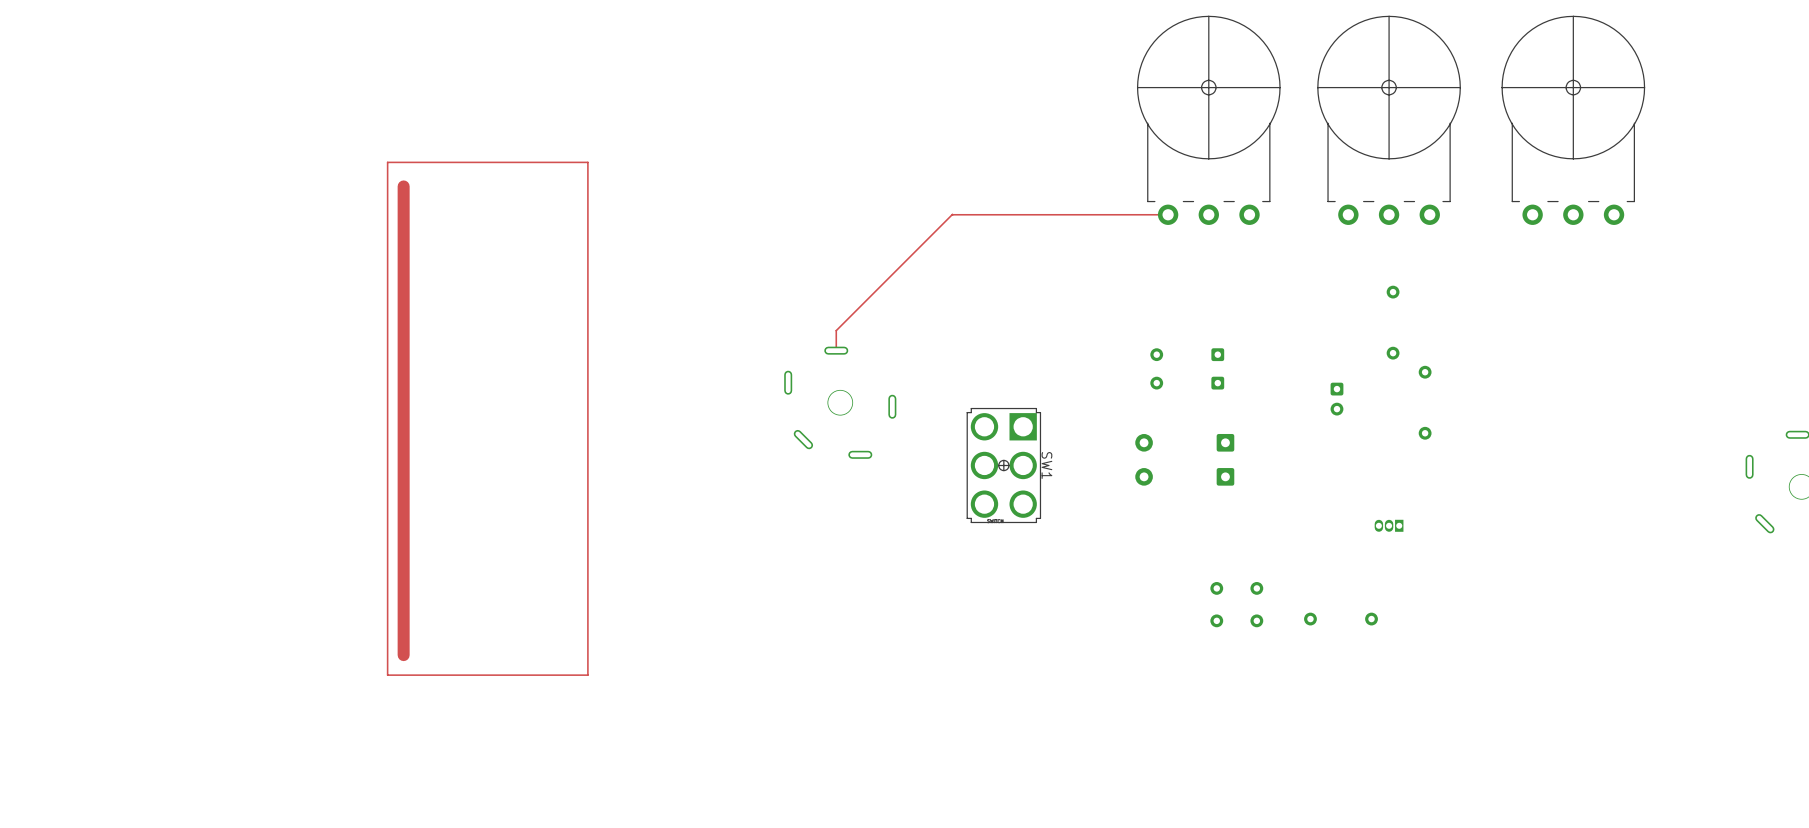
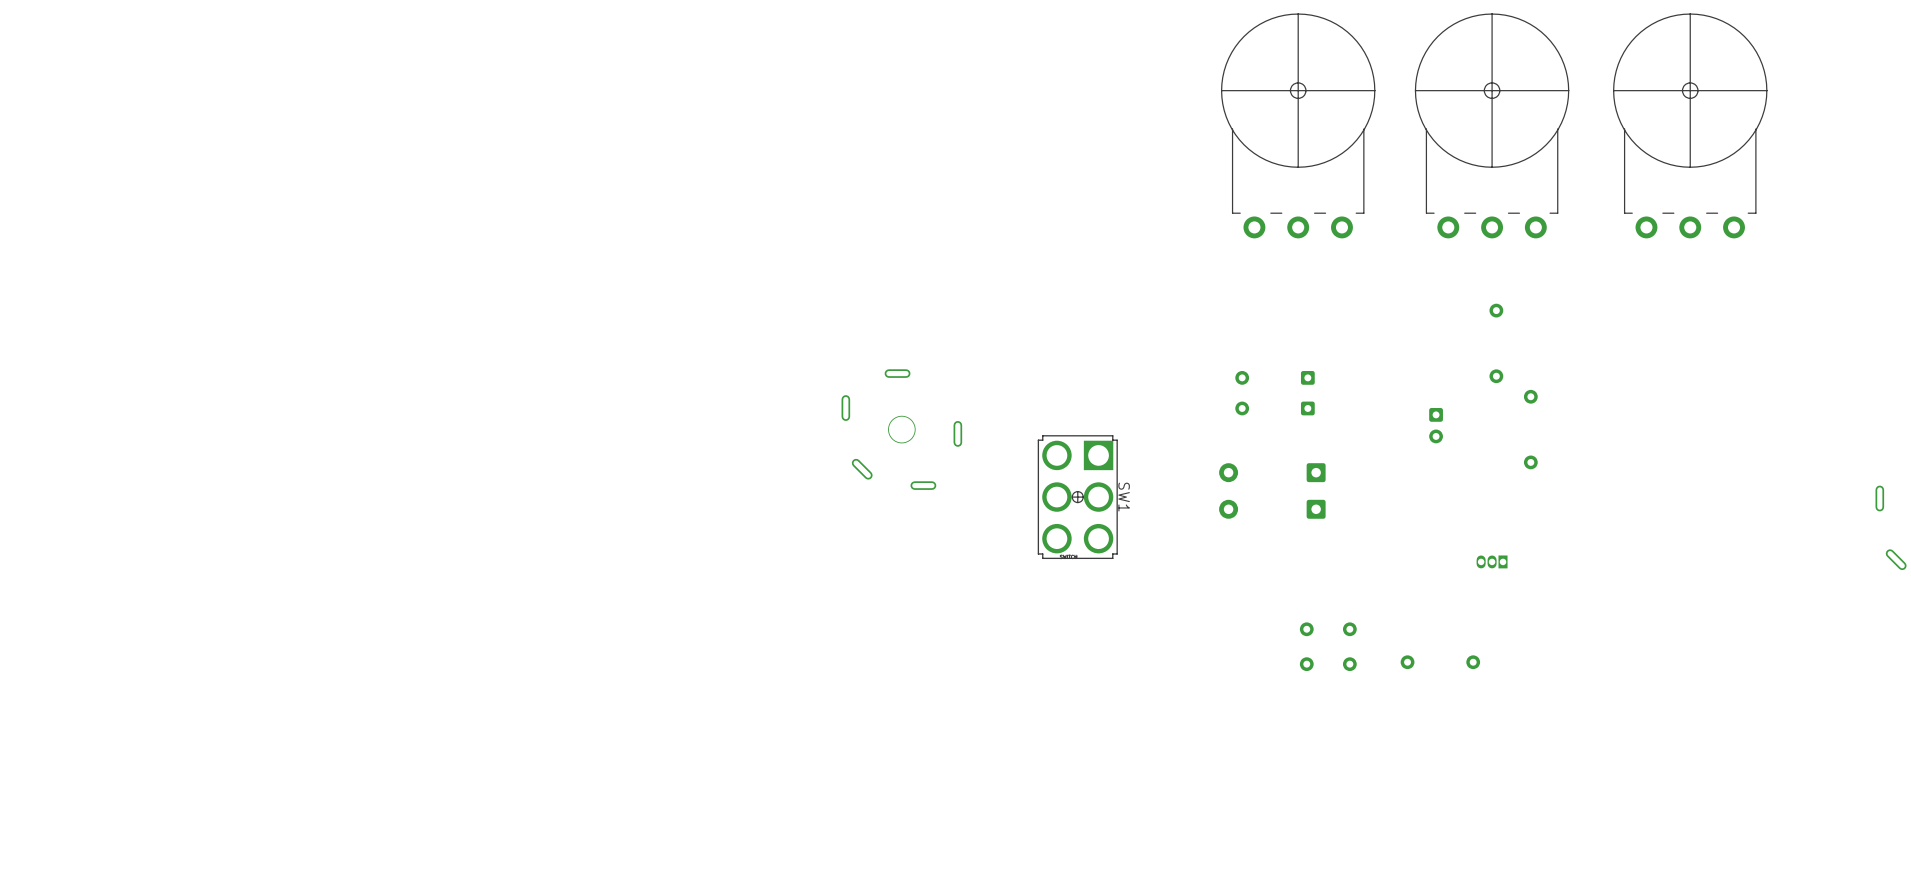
top track: (587, 162) (387, 162) (387, 675) (587, 675) (587, 162) -> none
top track: (403, 186) (403, 655) -> none
top track: (1168, 214) (952, 214) (836, 330) (836, 350) -> none

